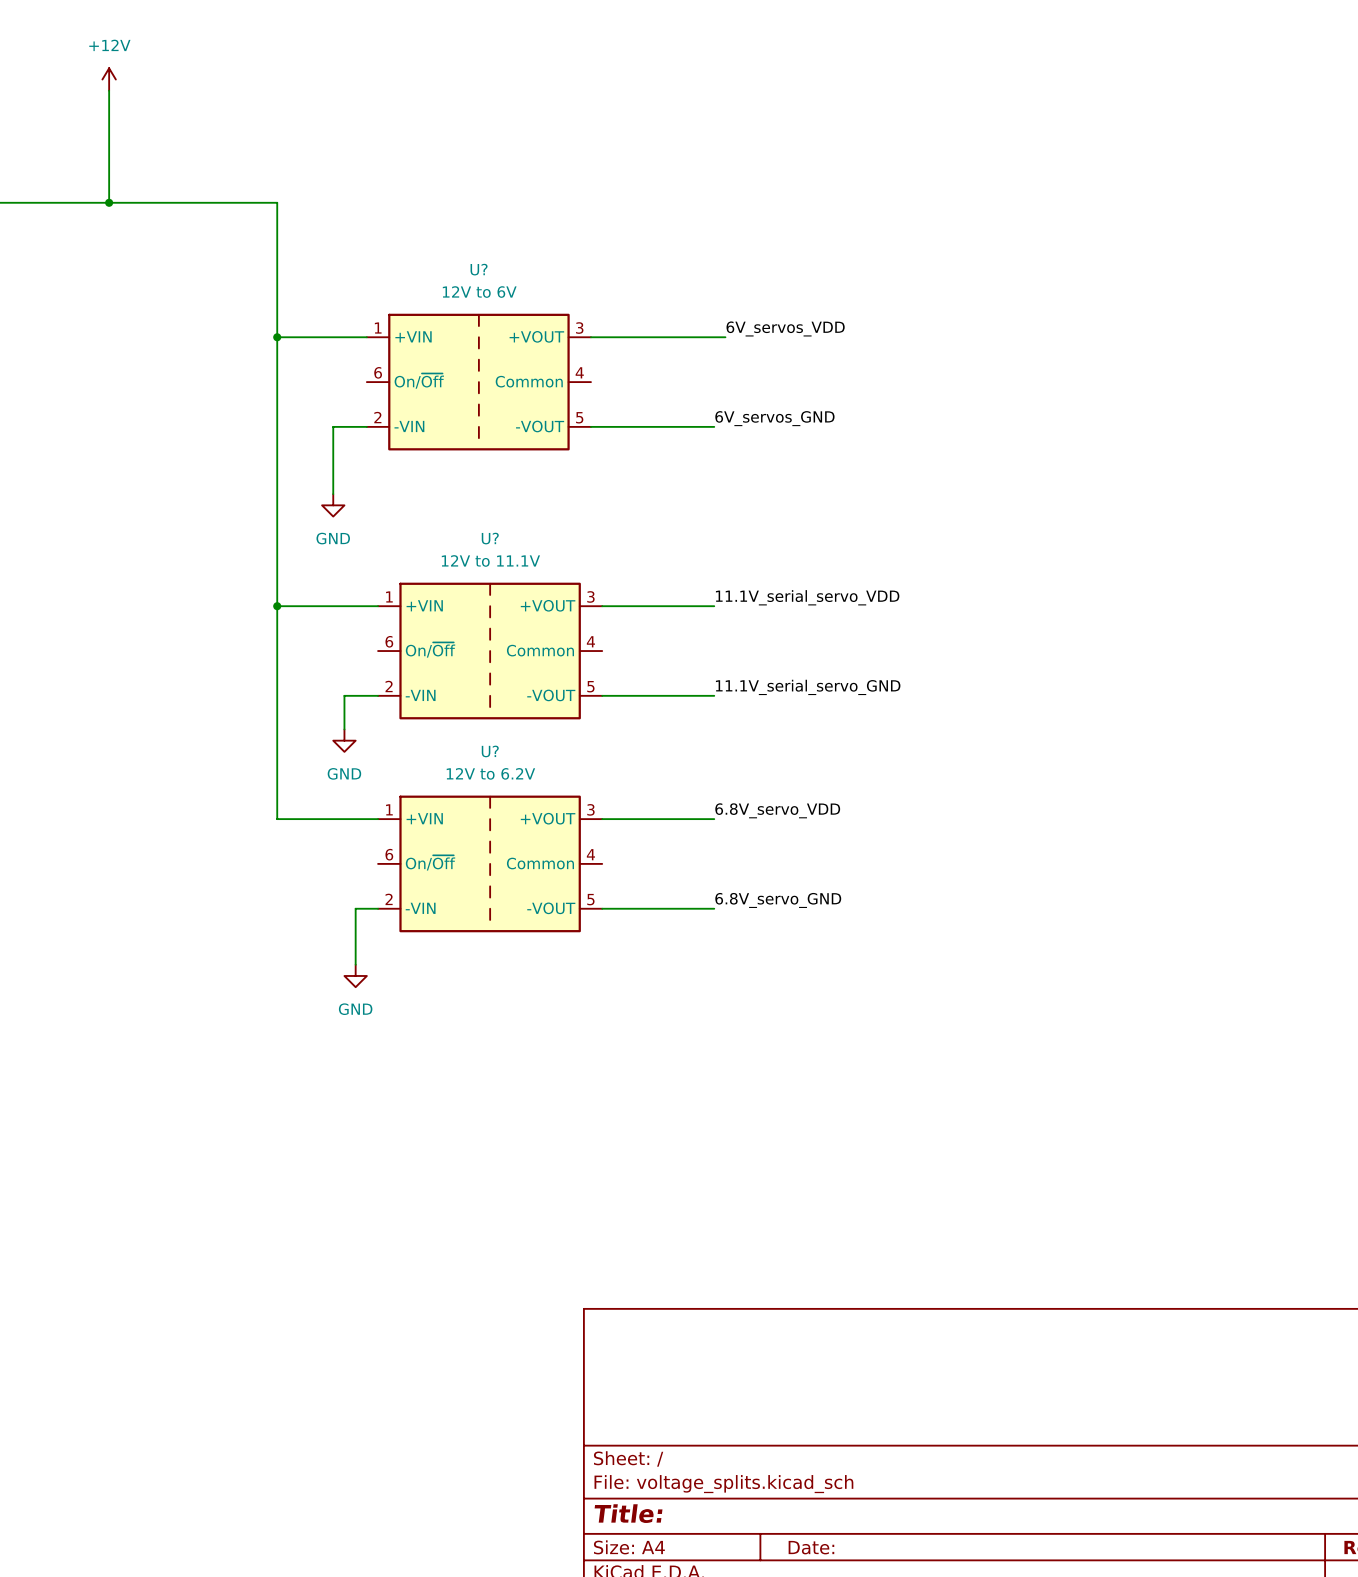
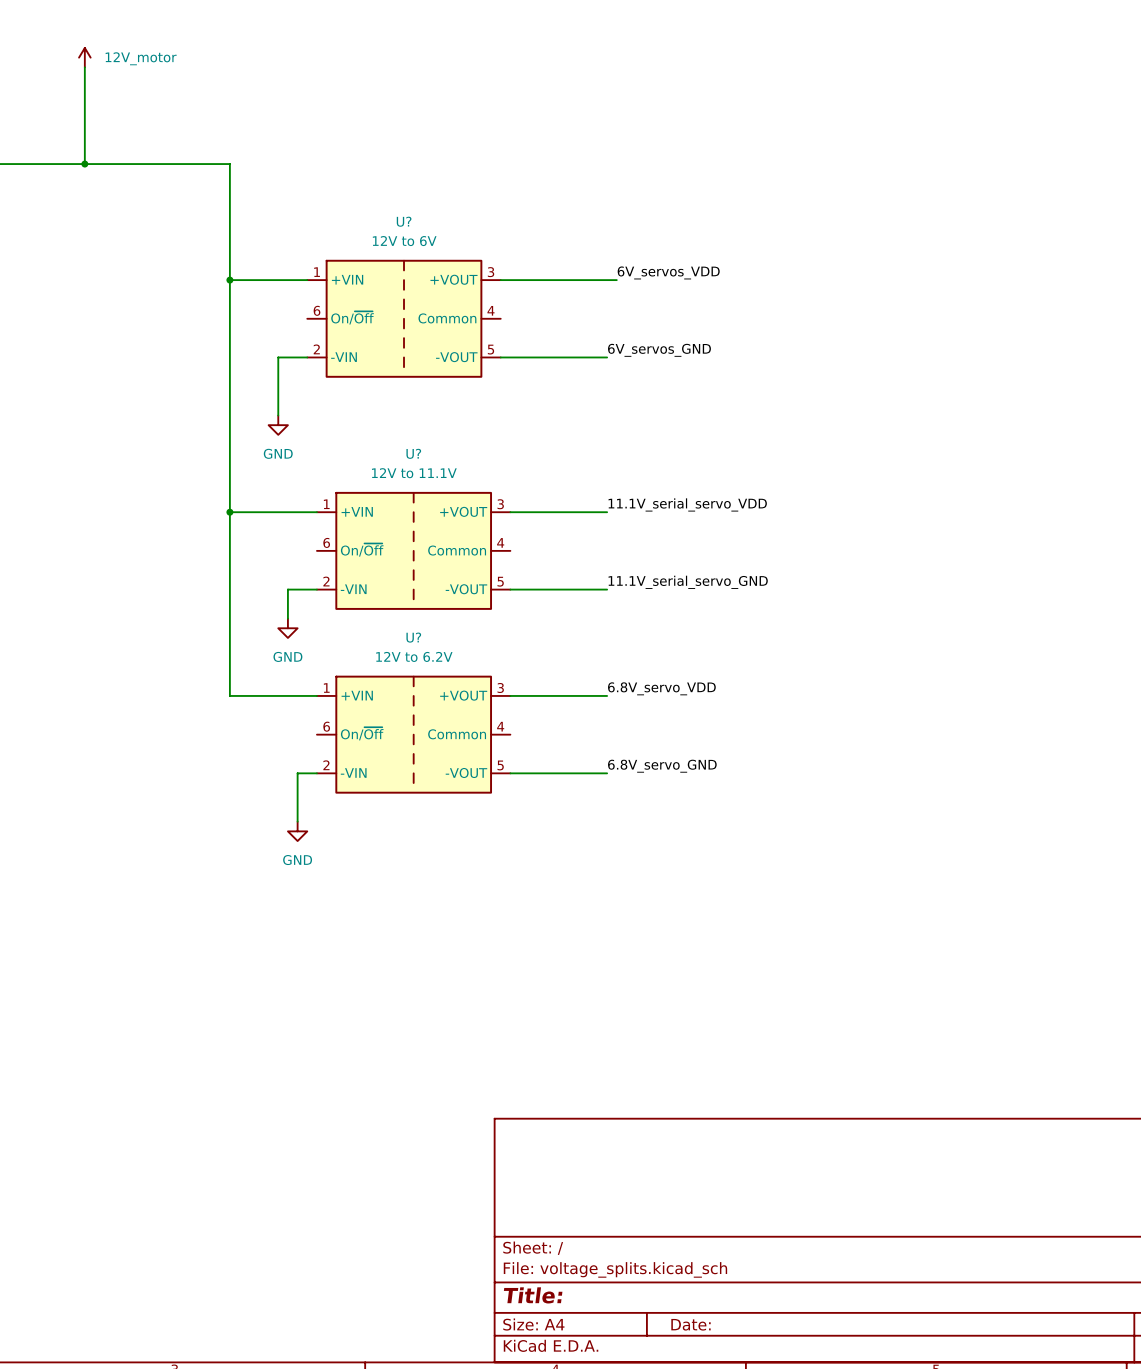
power symbol: +12V (109, 79) -> 12V_motor (84, 57)

